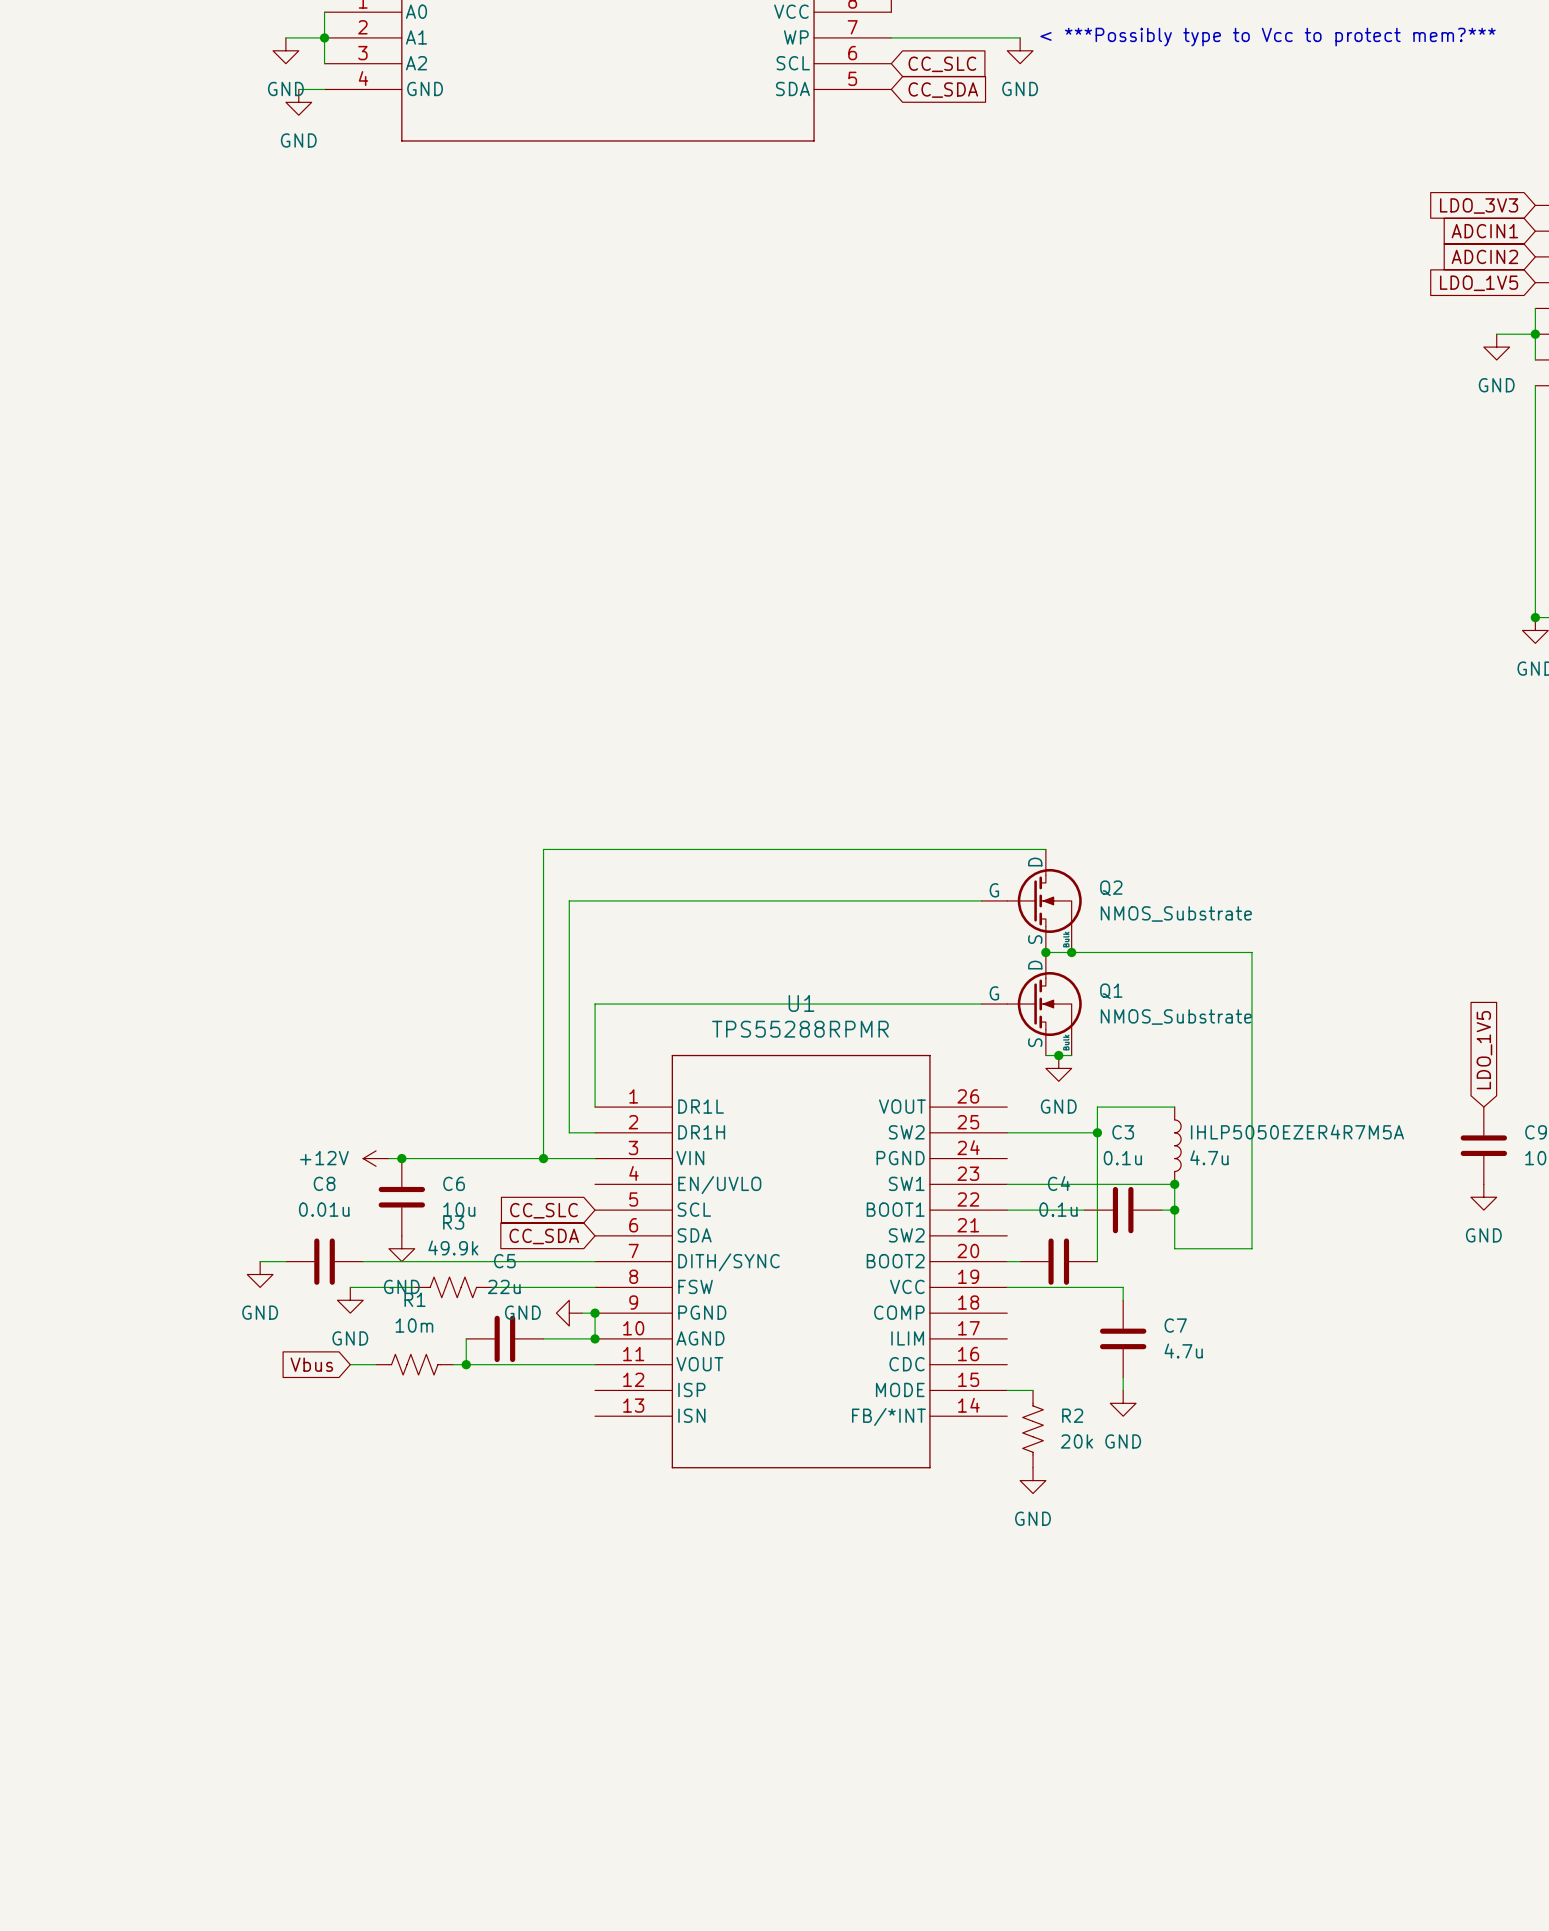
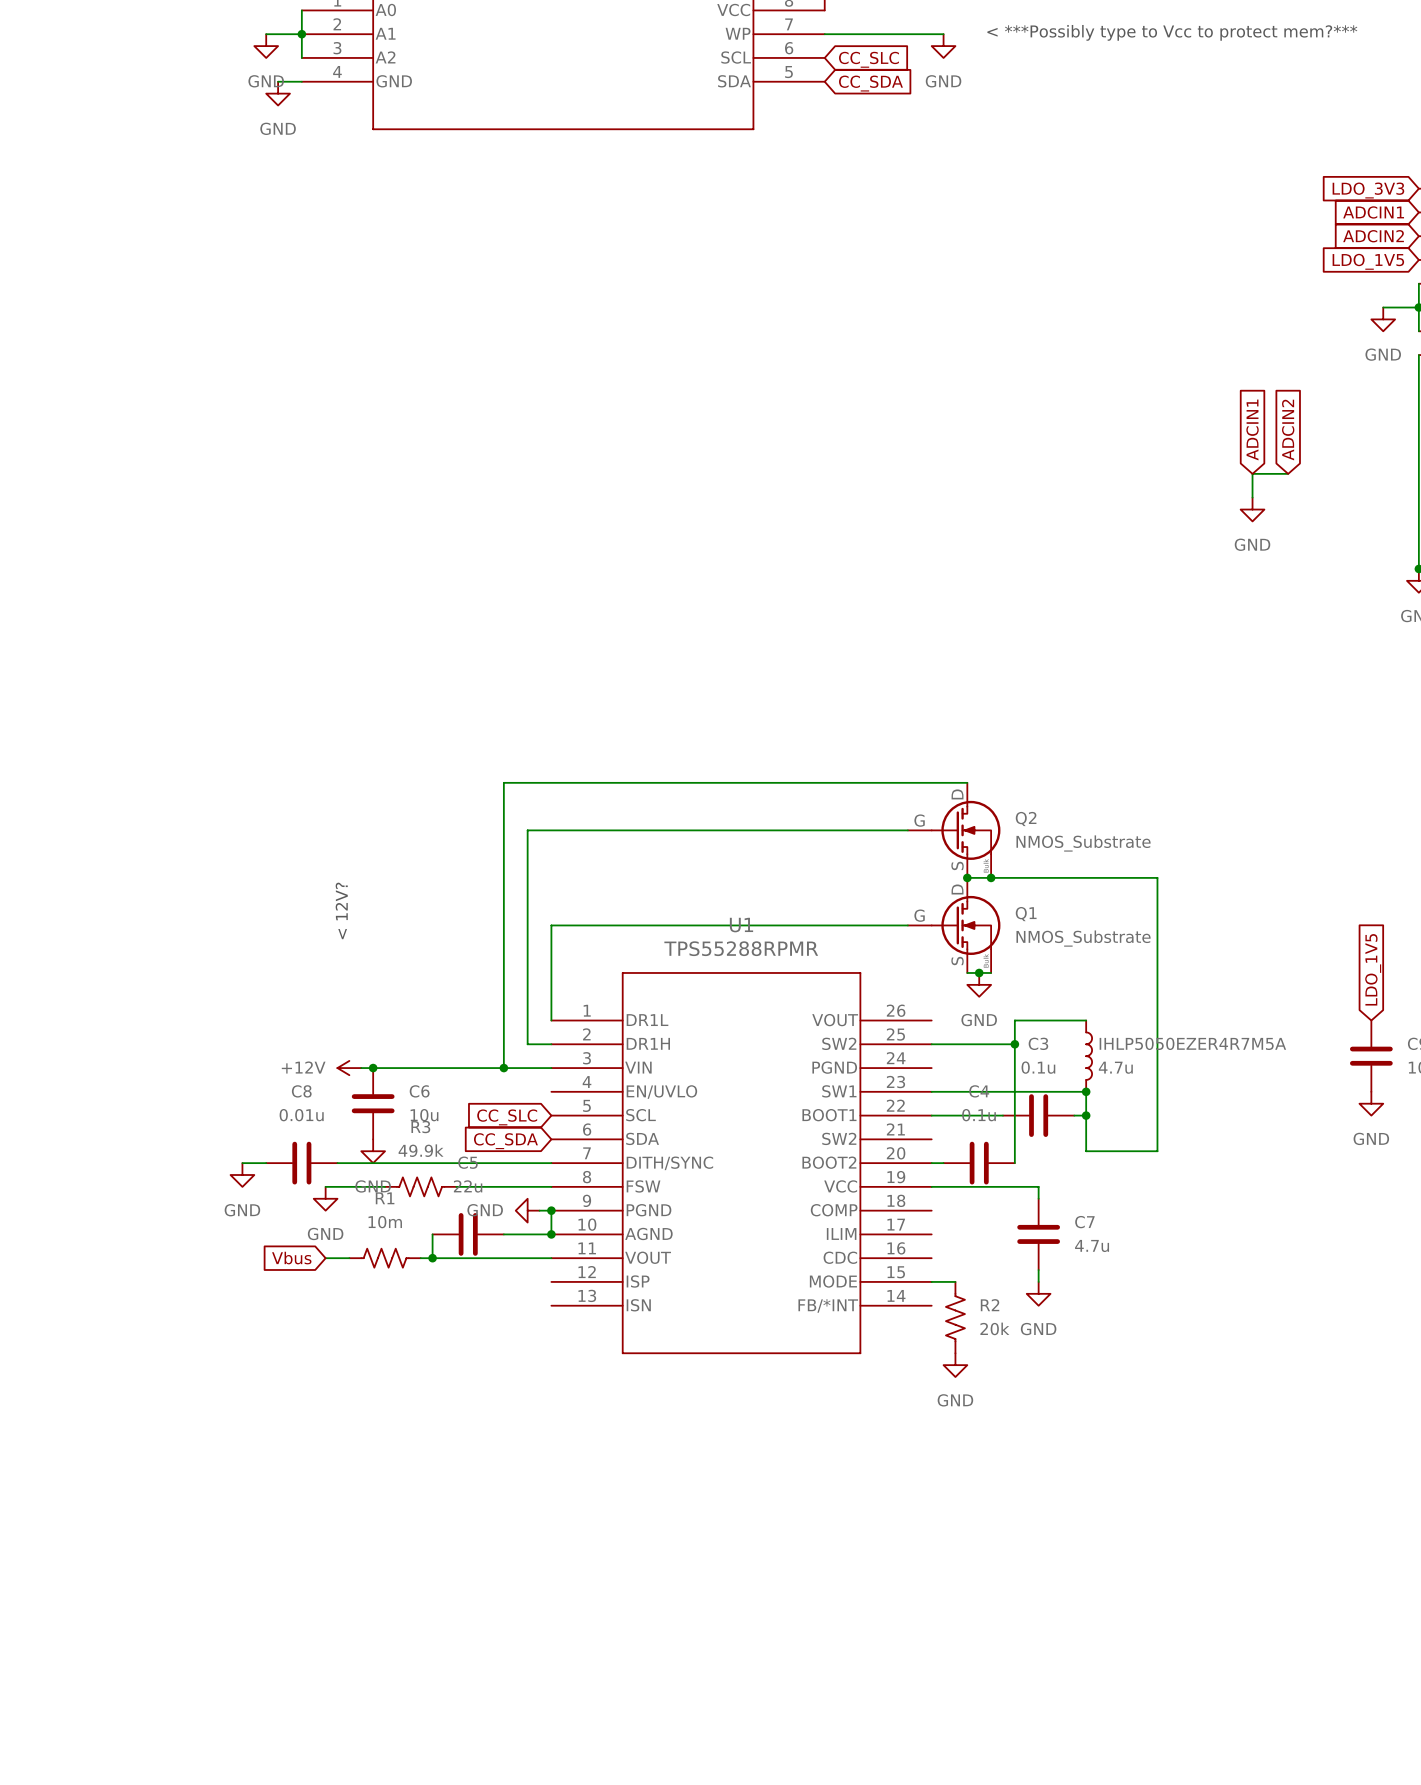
global label: none -> ADCIN1 (1252, 429)
global label: none -> ADCIN2 (1288, 430)
wire: none -> (1288, 473) (1252, 473) (1252, 497)
power symbol: none -> GND (1252, 509)
text: none -> < 12V? (341, 910)

